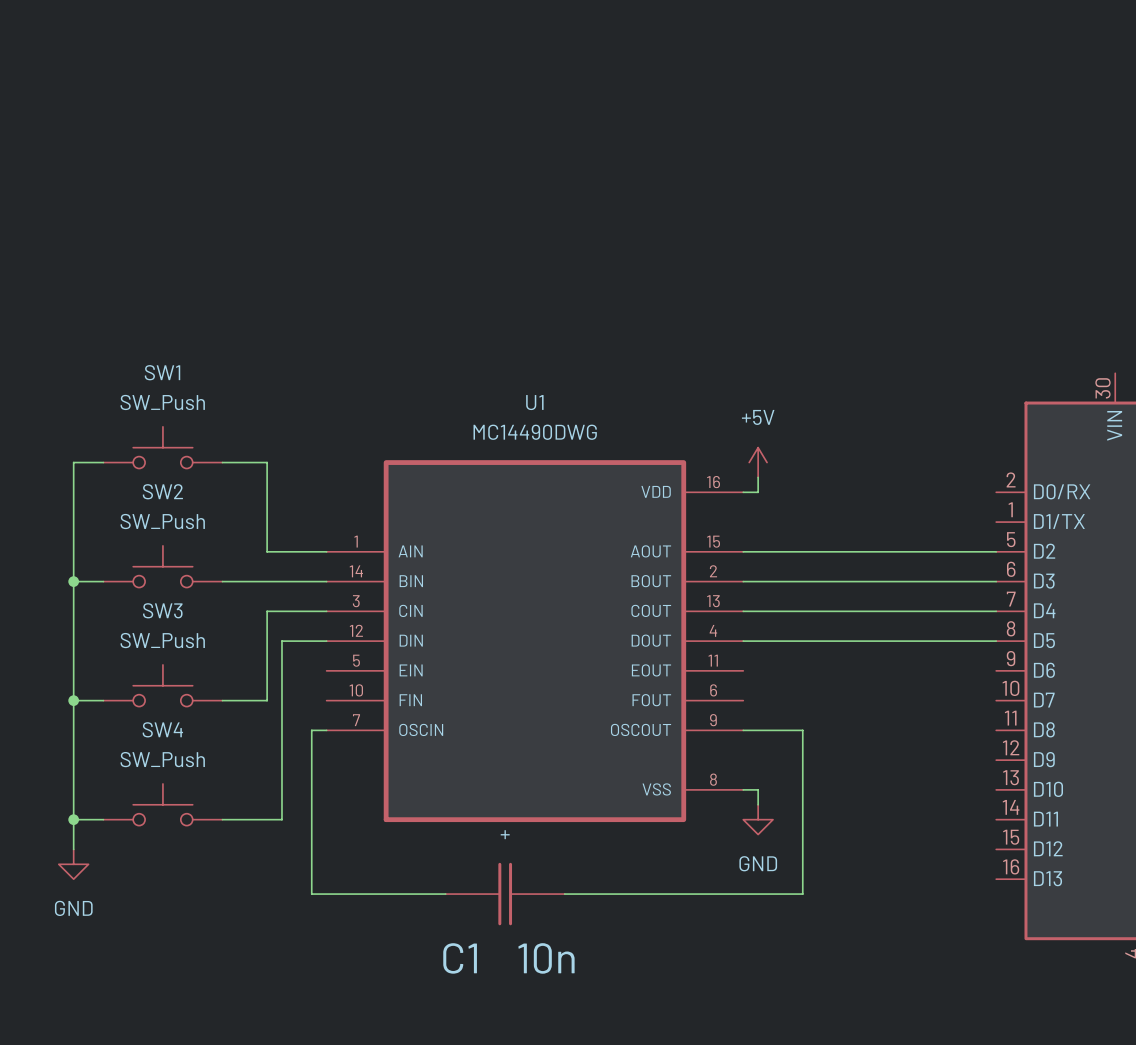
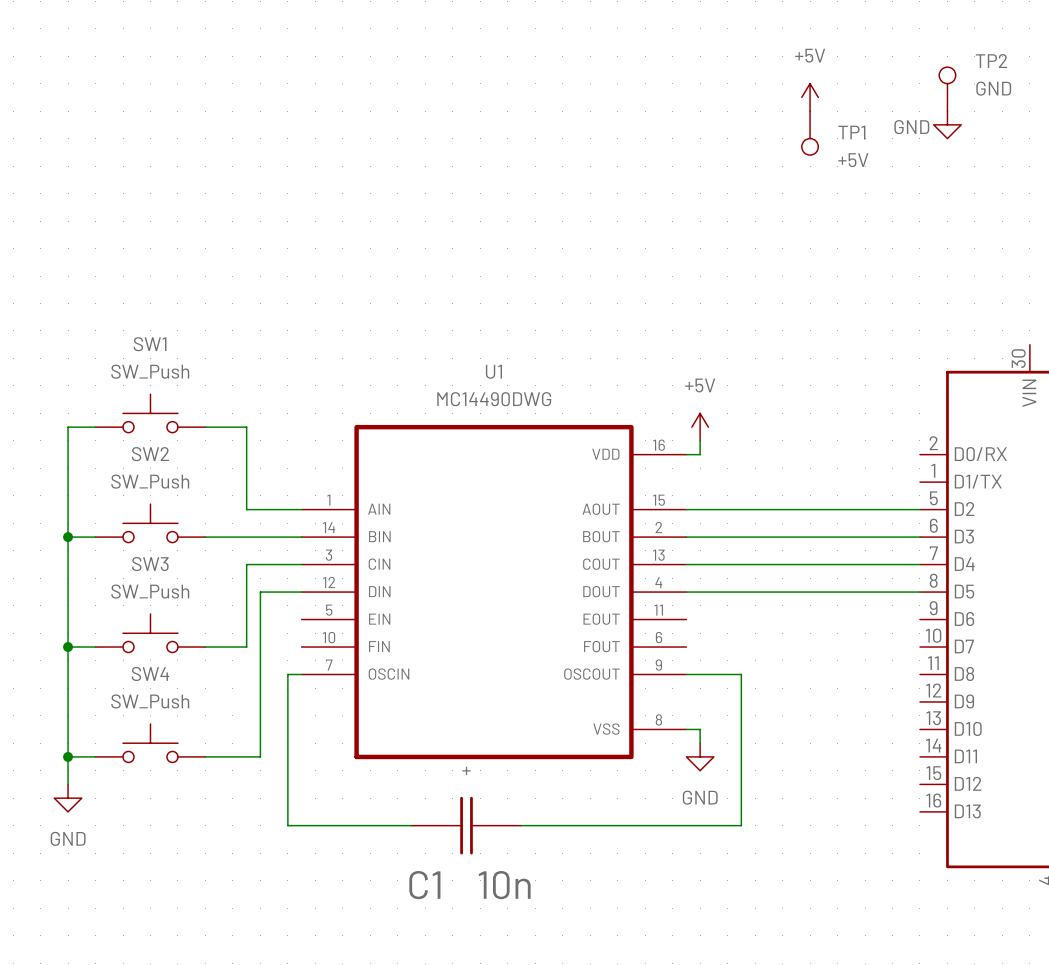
TP2: none -> GND (947, 89)
power symbol: none -> +5V (810, 97)
power symbol: none -> GND (947, 124)
TP1: none -> +5V (810, 133)

